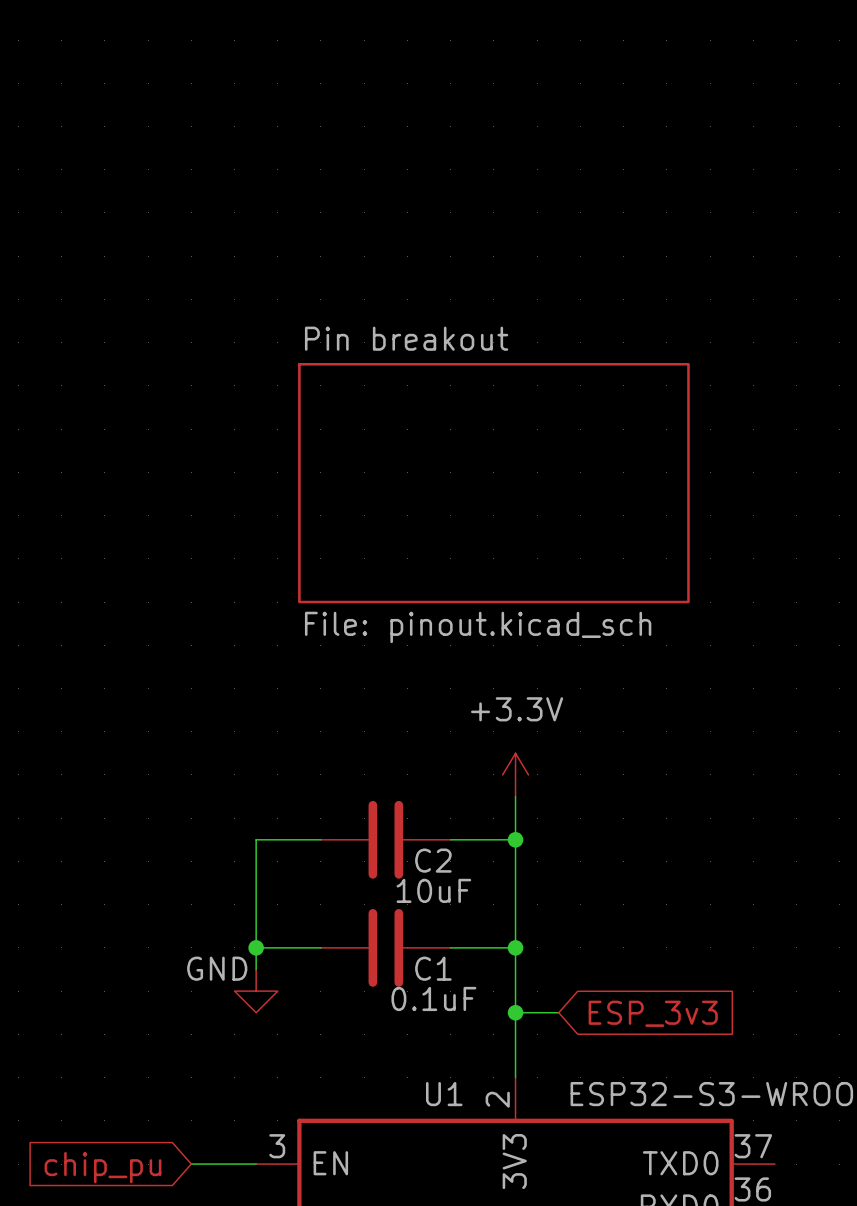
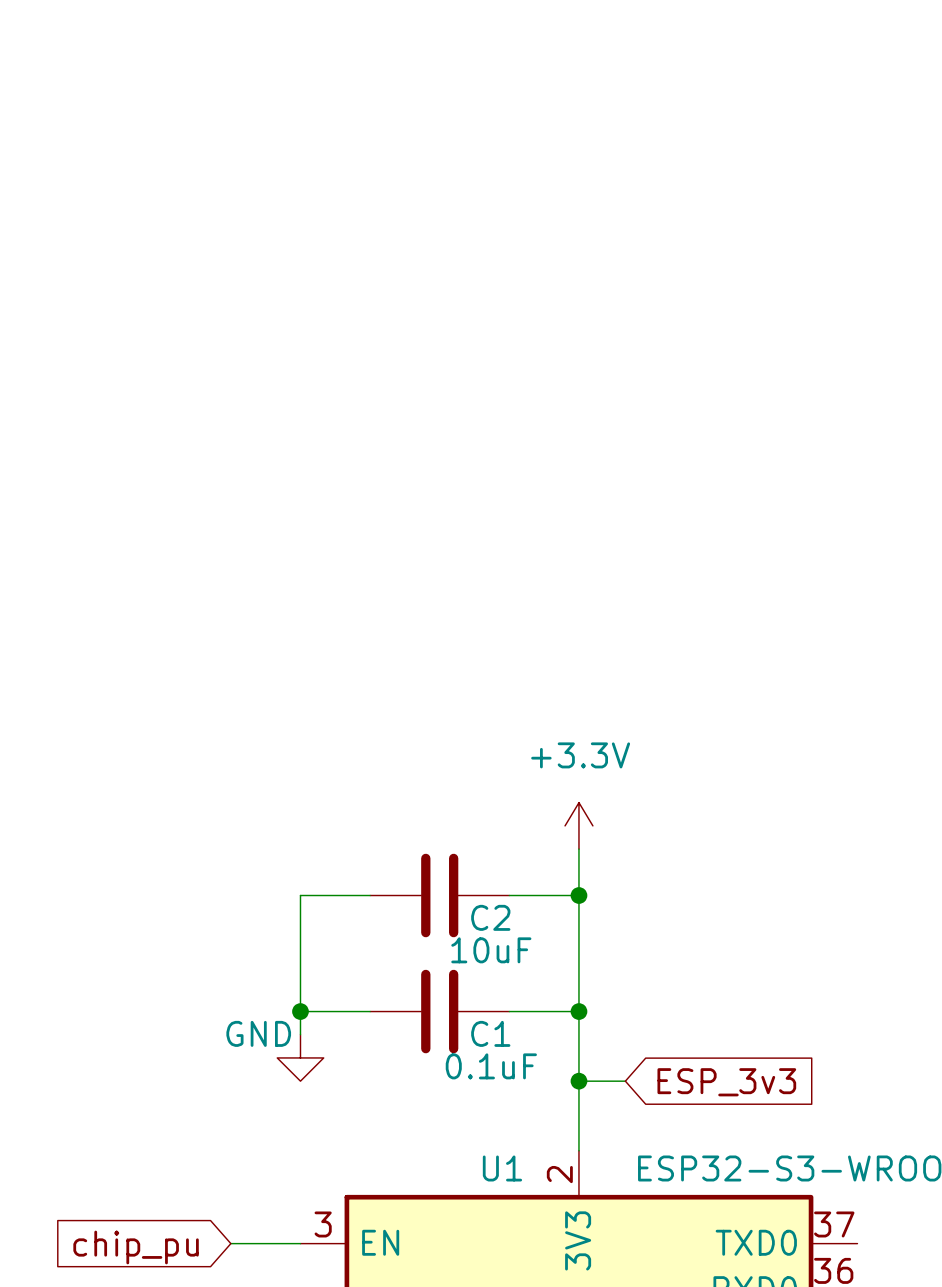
sheet Pin breakout: File: pinout.kicad_sch (493, 483) -> none

